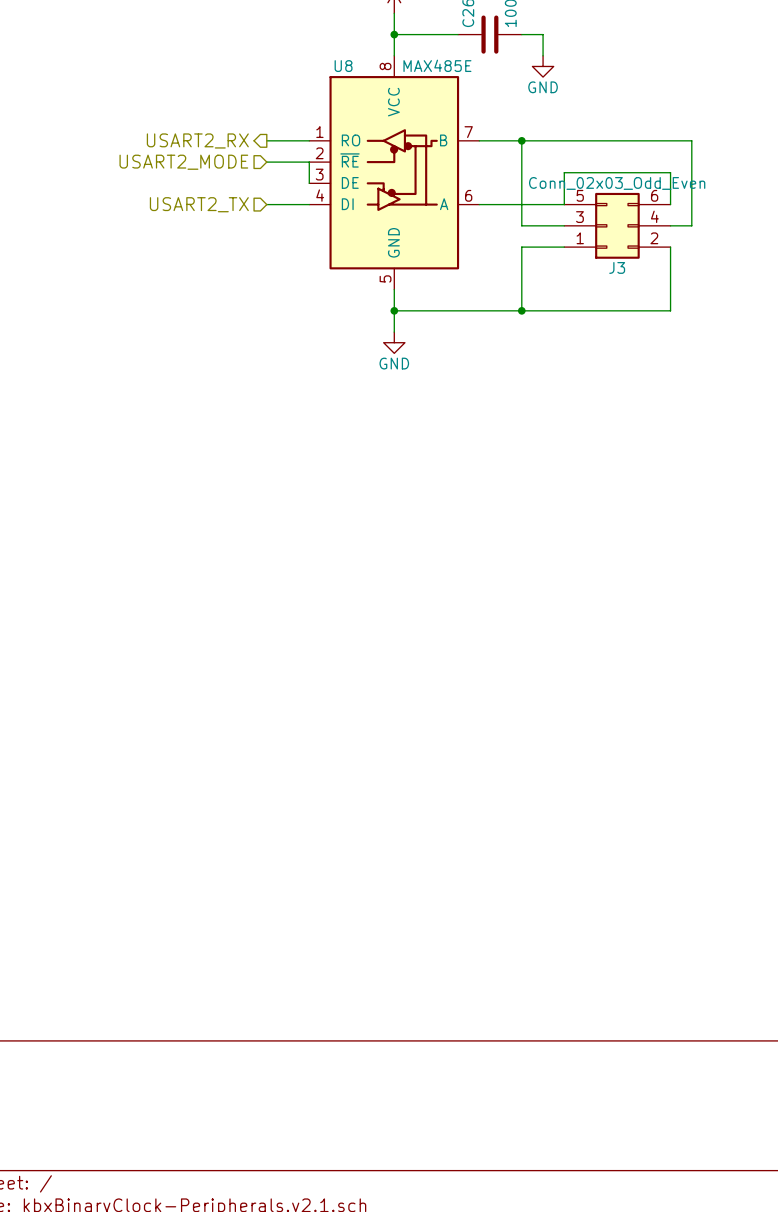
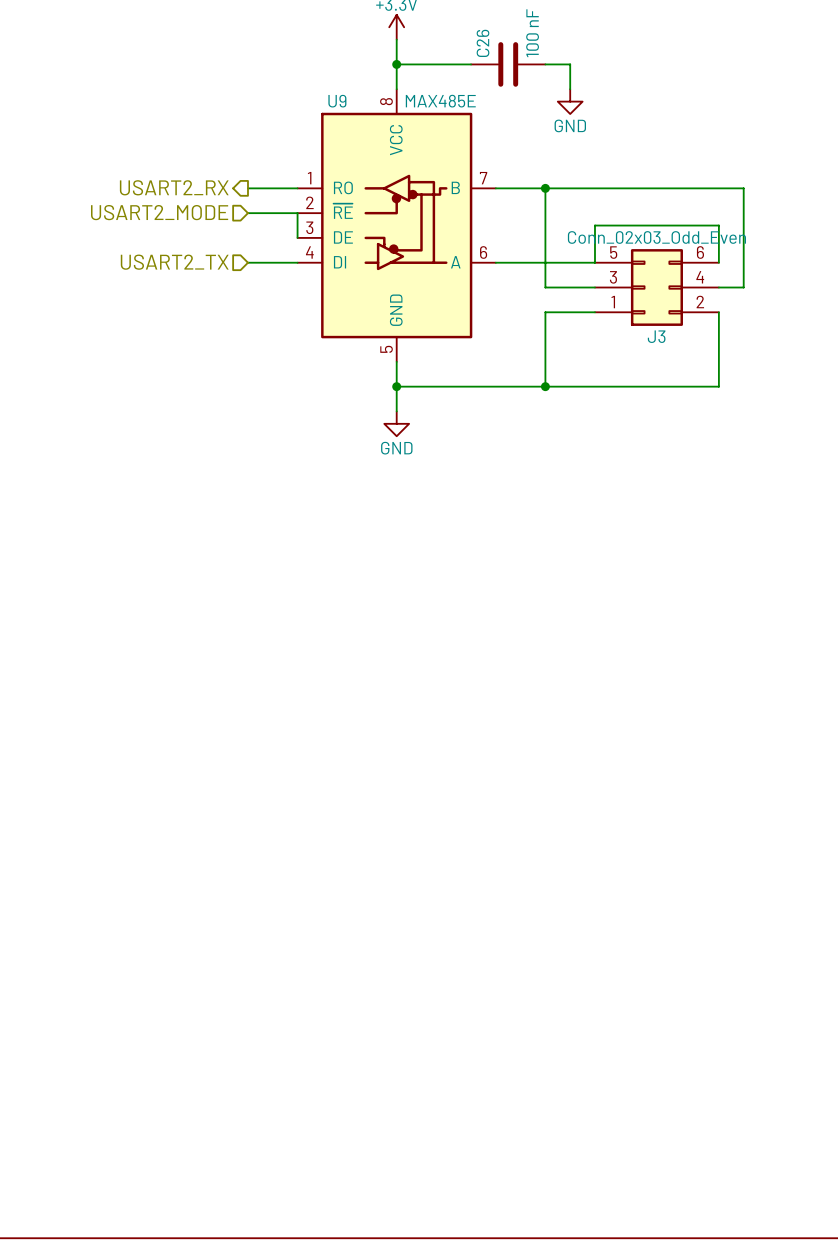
U8 name: U8 (343, 66) -> U9 (337, 101)

